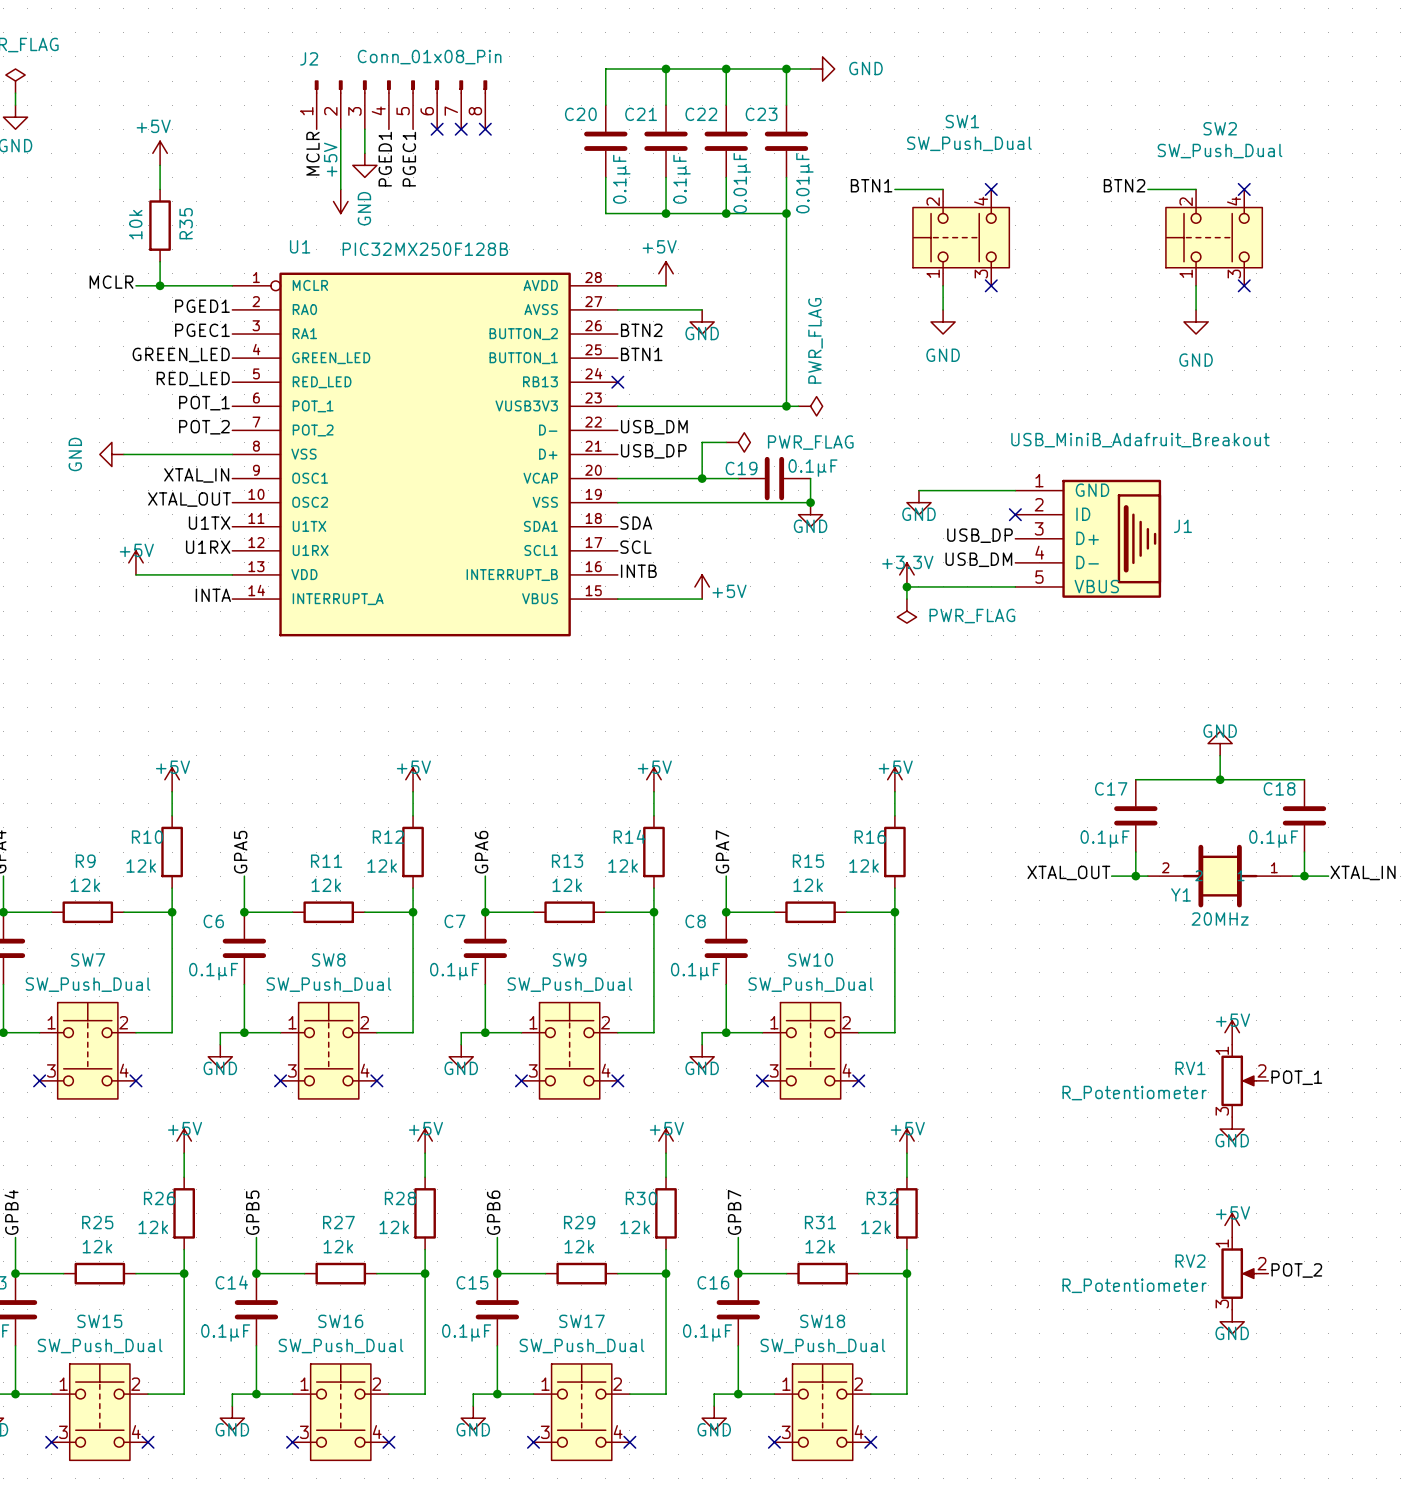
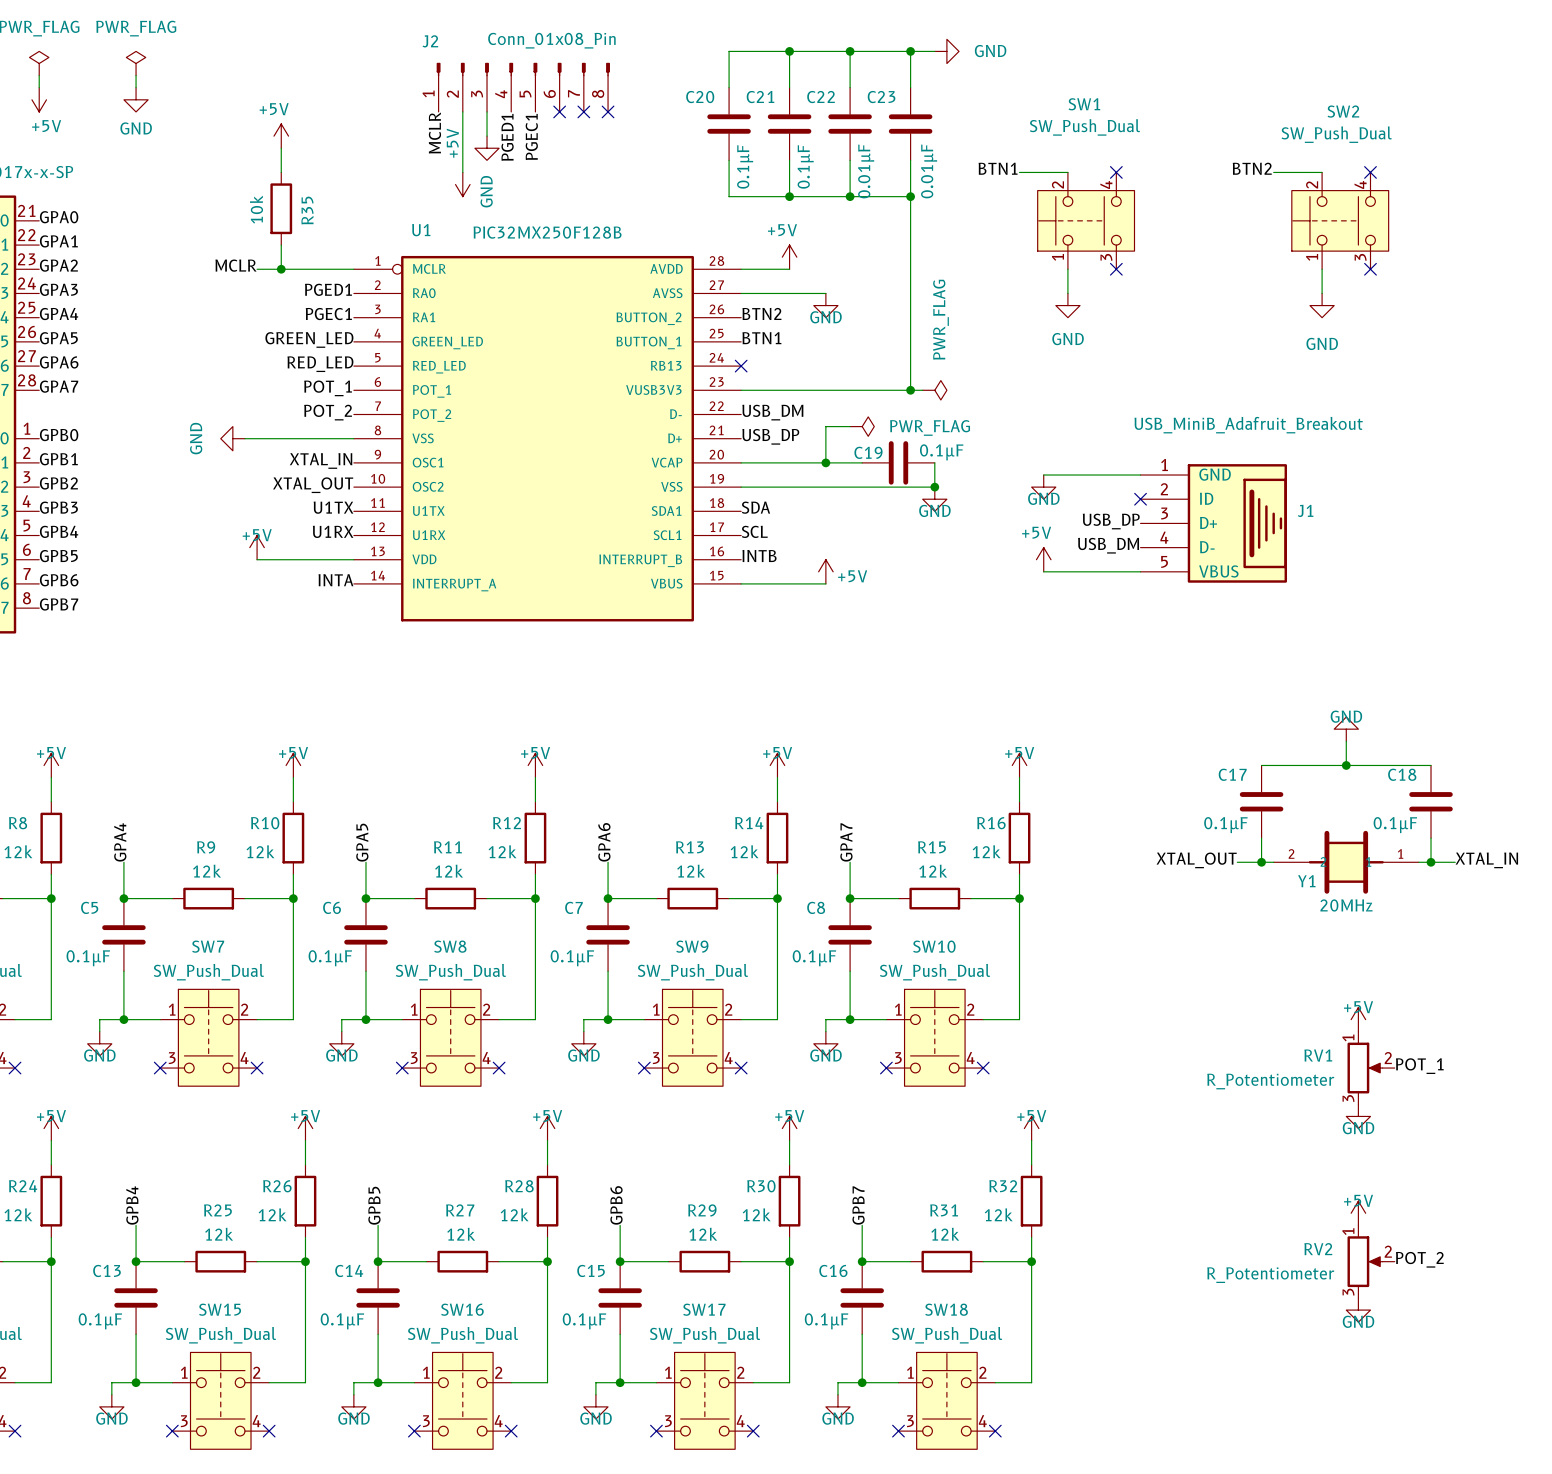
power symbol: +3.3V (906, 574) -> none
power symbol: none -> +5V (1043, 559)
junction: (906, 586) -> none
wire: (918, 586) (906, 586) (906, 599) -> none
power symbol: PWR_FLAG (906, 611) -> none

